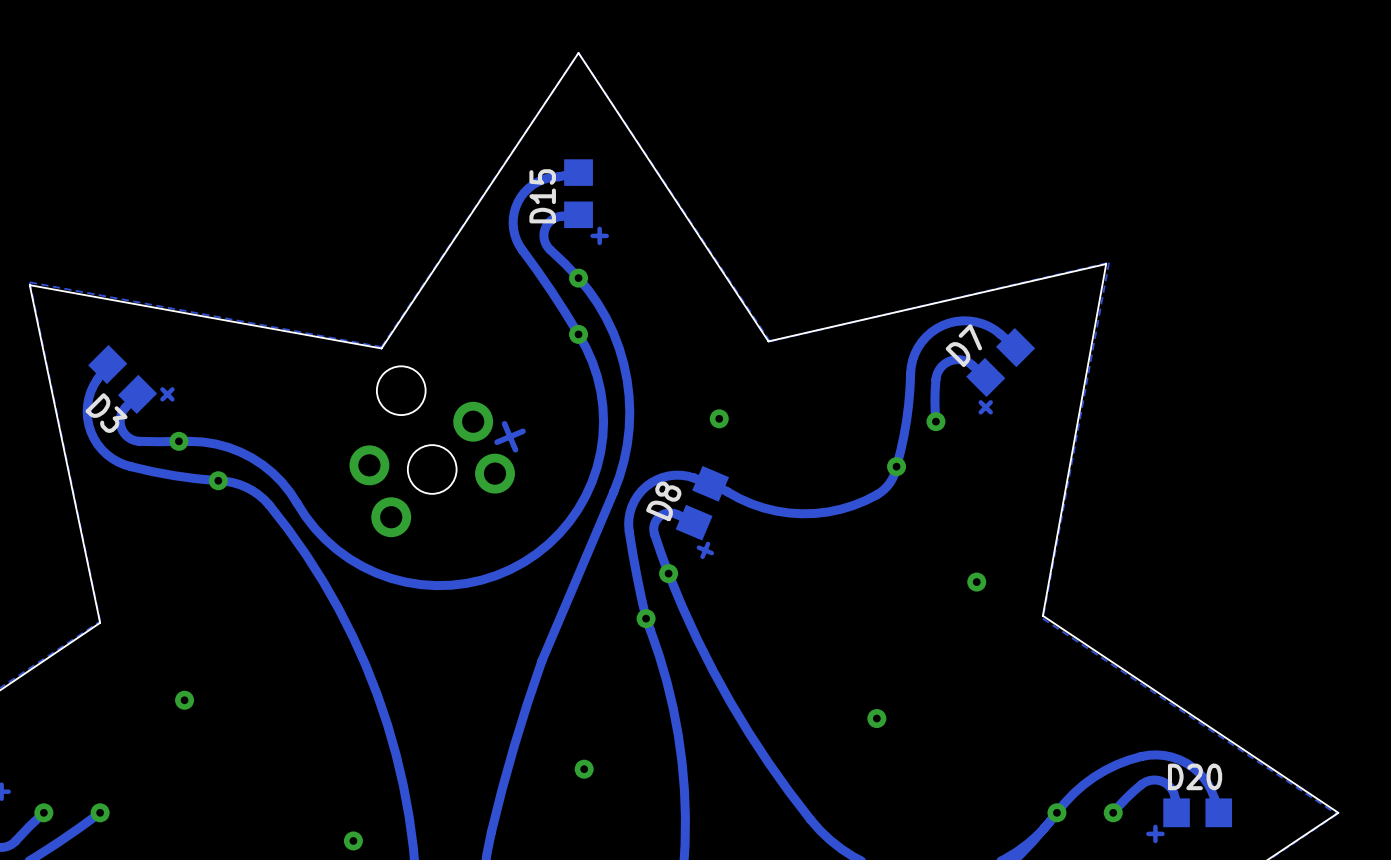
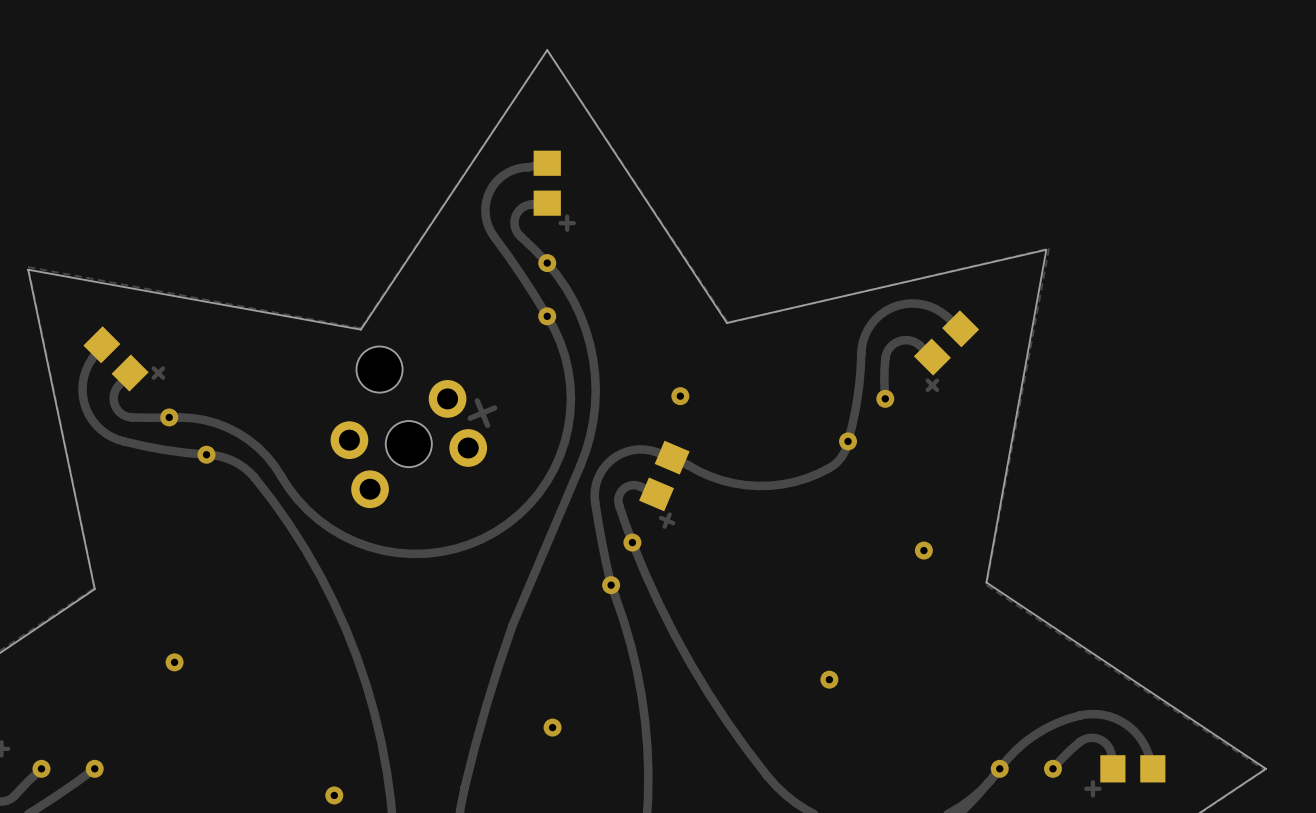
D15 name: D15 (542, 196) -> none
D7 name: D7 (963, 345) -> none
D3 name: D3 (106, 413) -> none
D8 name: D8 (663, 501) -> none
D20 name: D20 (1195, 776) -> none

